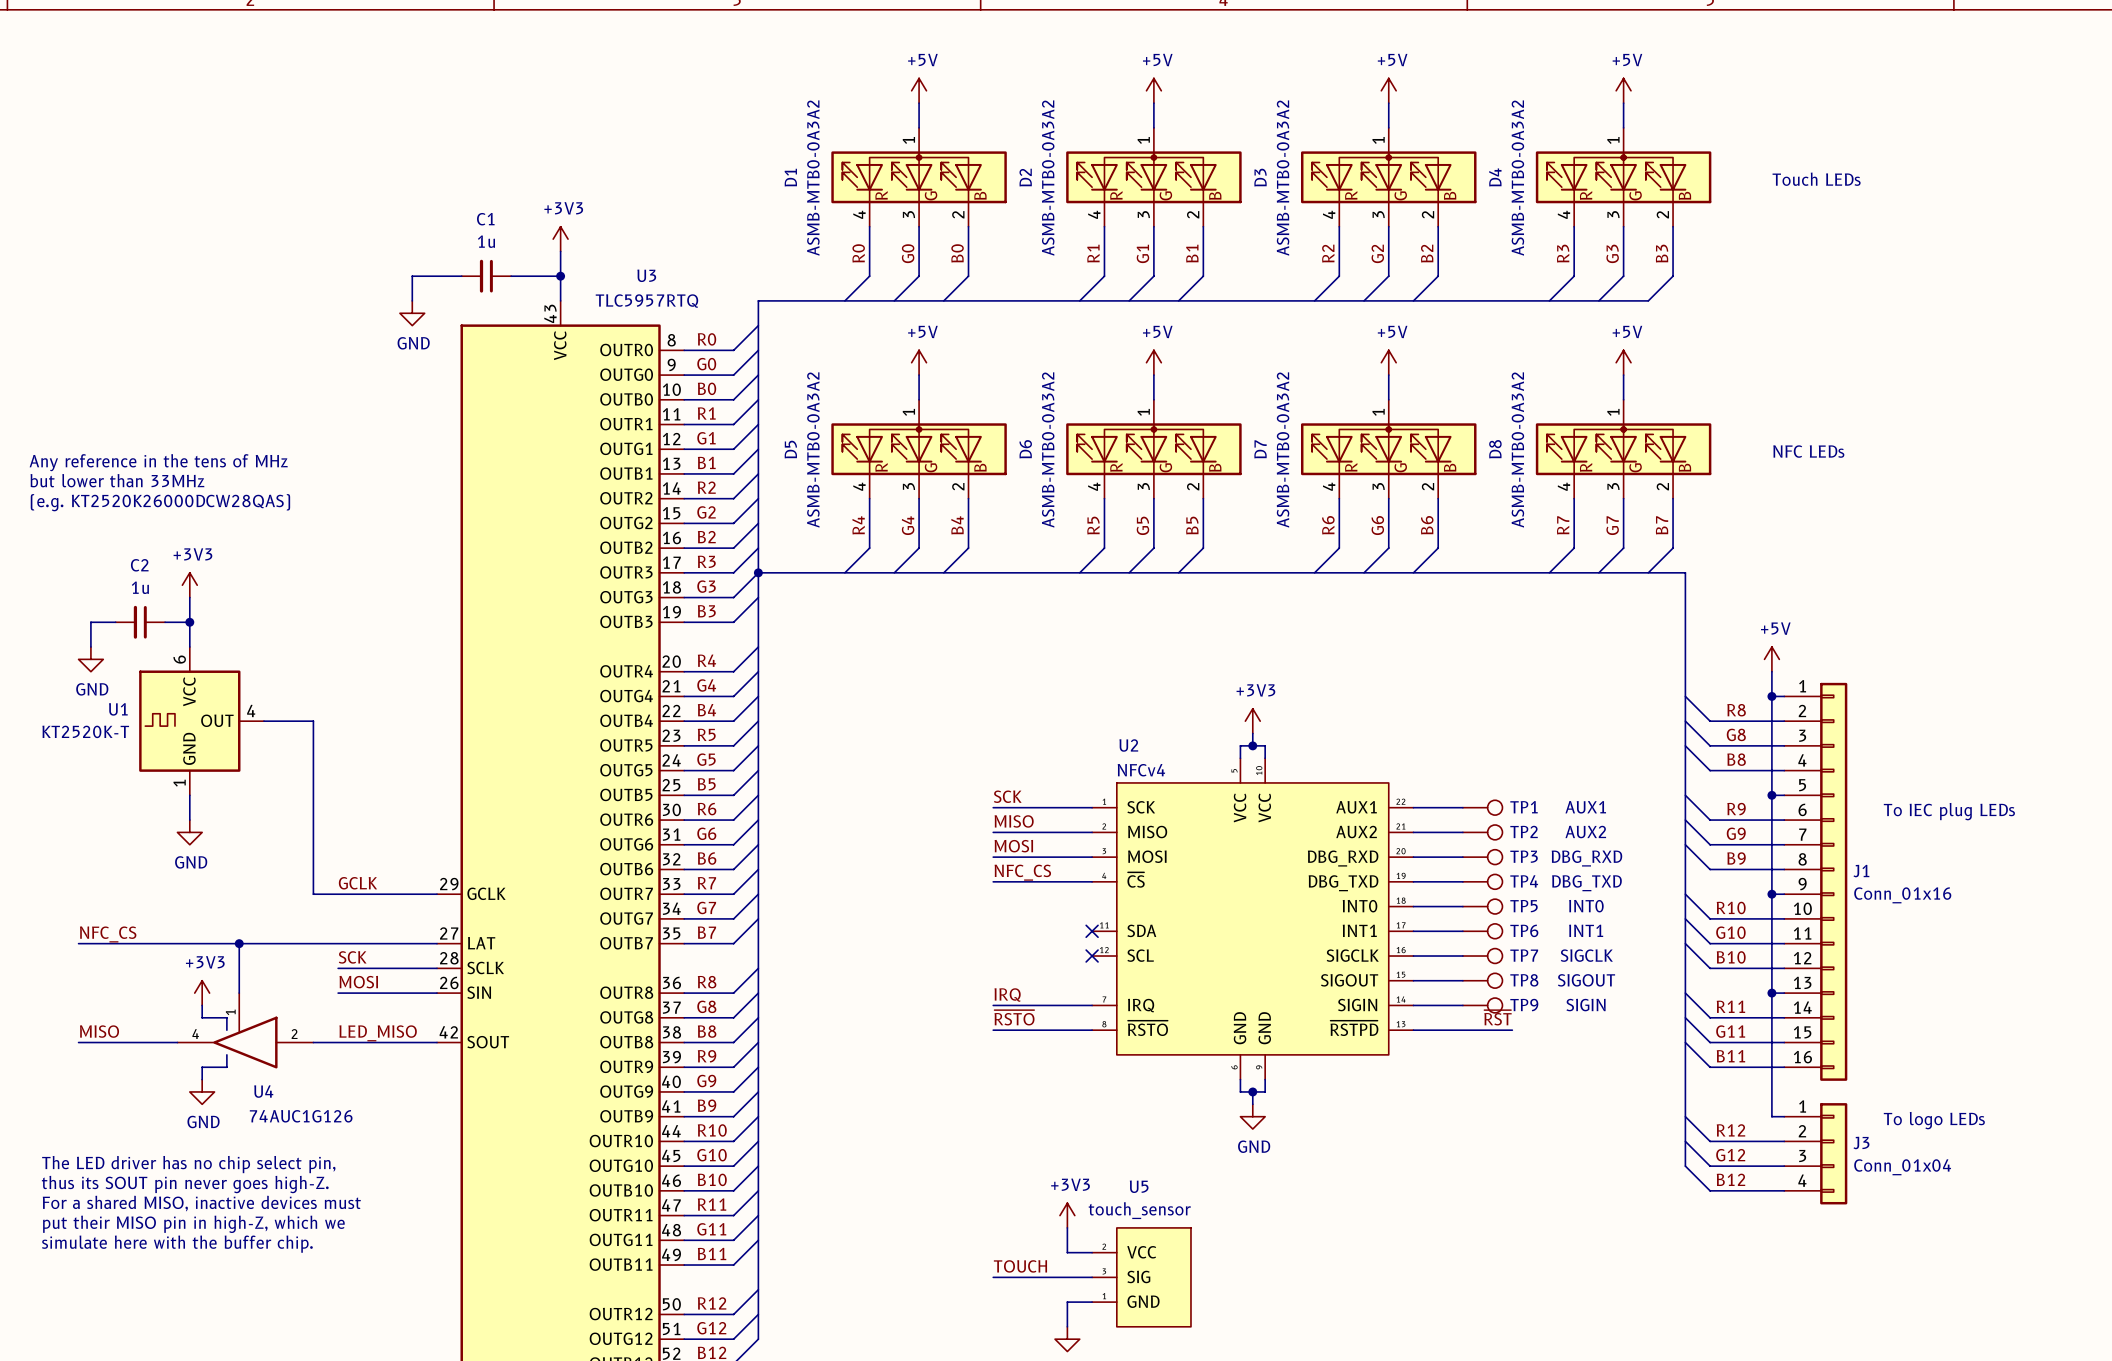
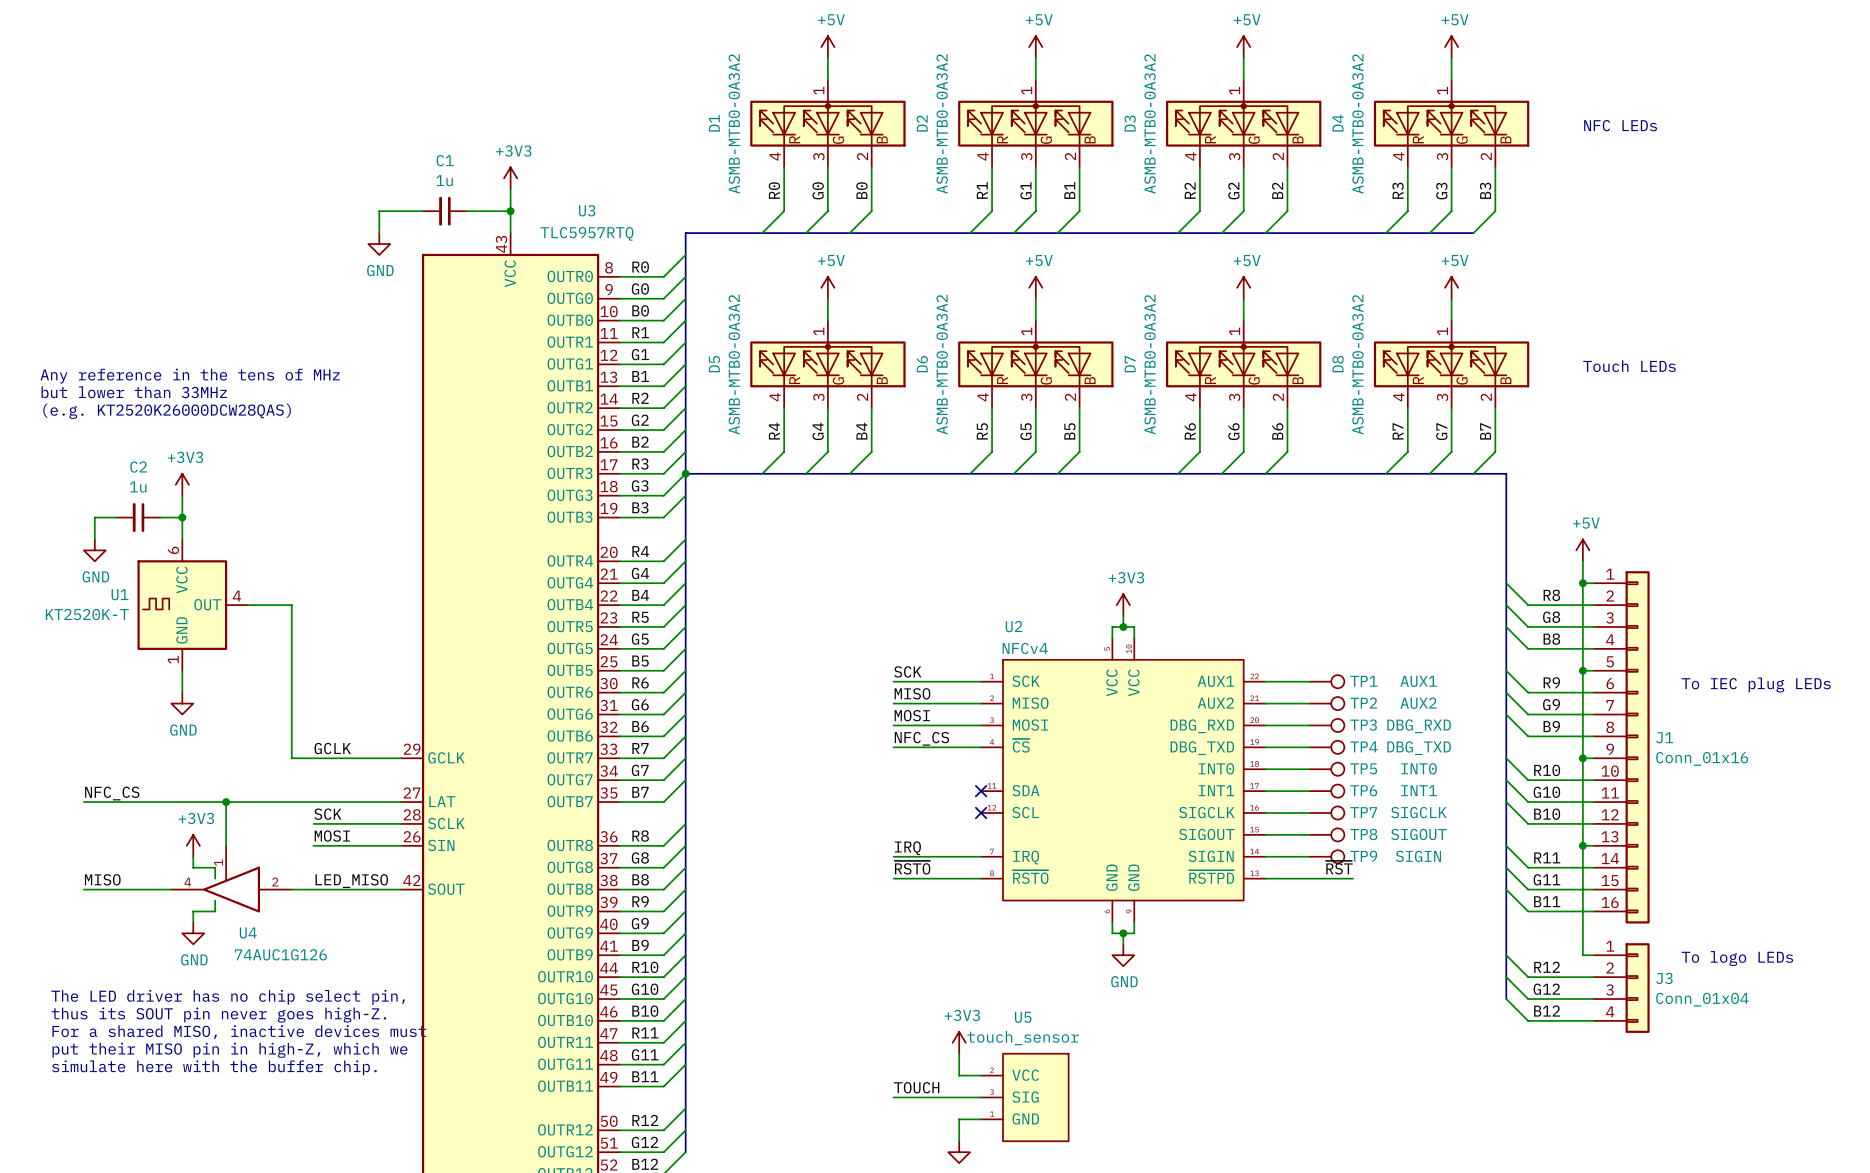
text: Touch LEDs (1816, 179) -> NFC LEDs (1620, 125)
text: NFC LEDs (1808, 451) -> Touch LEDs (1629, 366)

